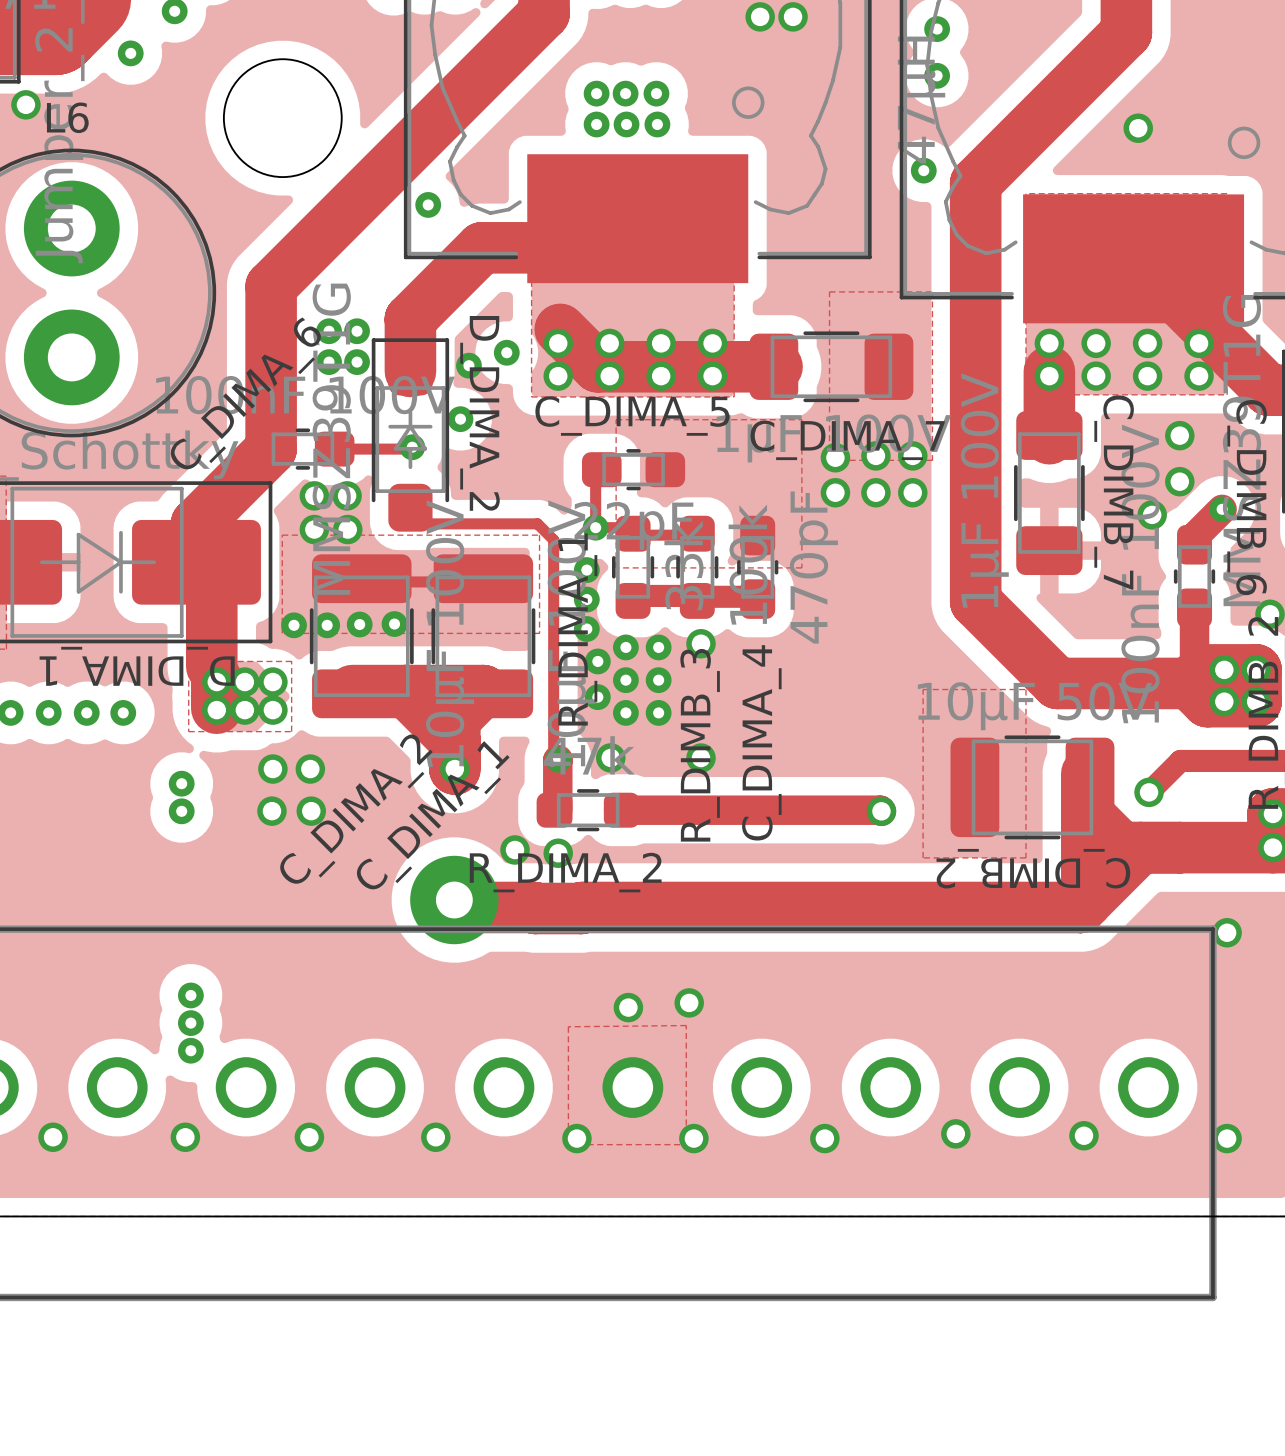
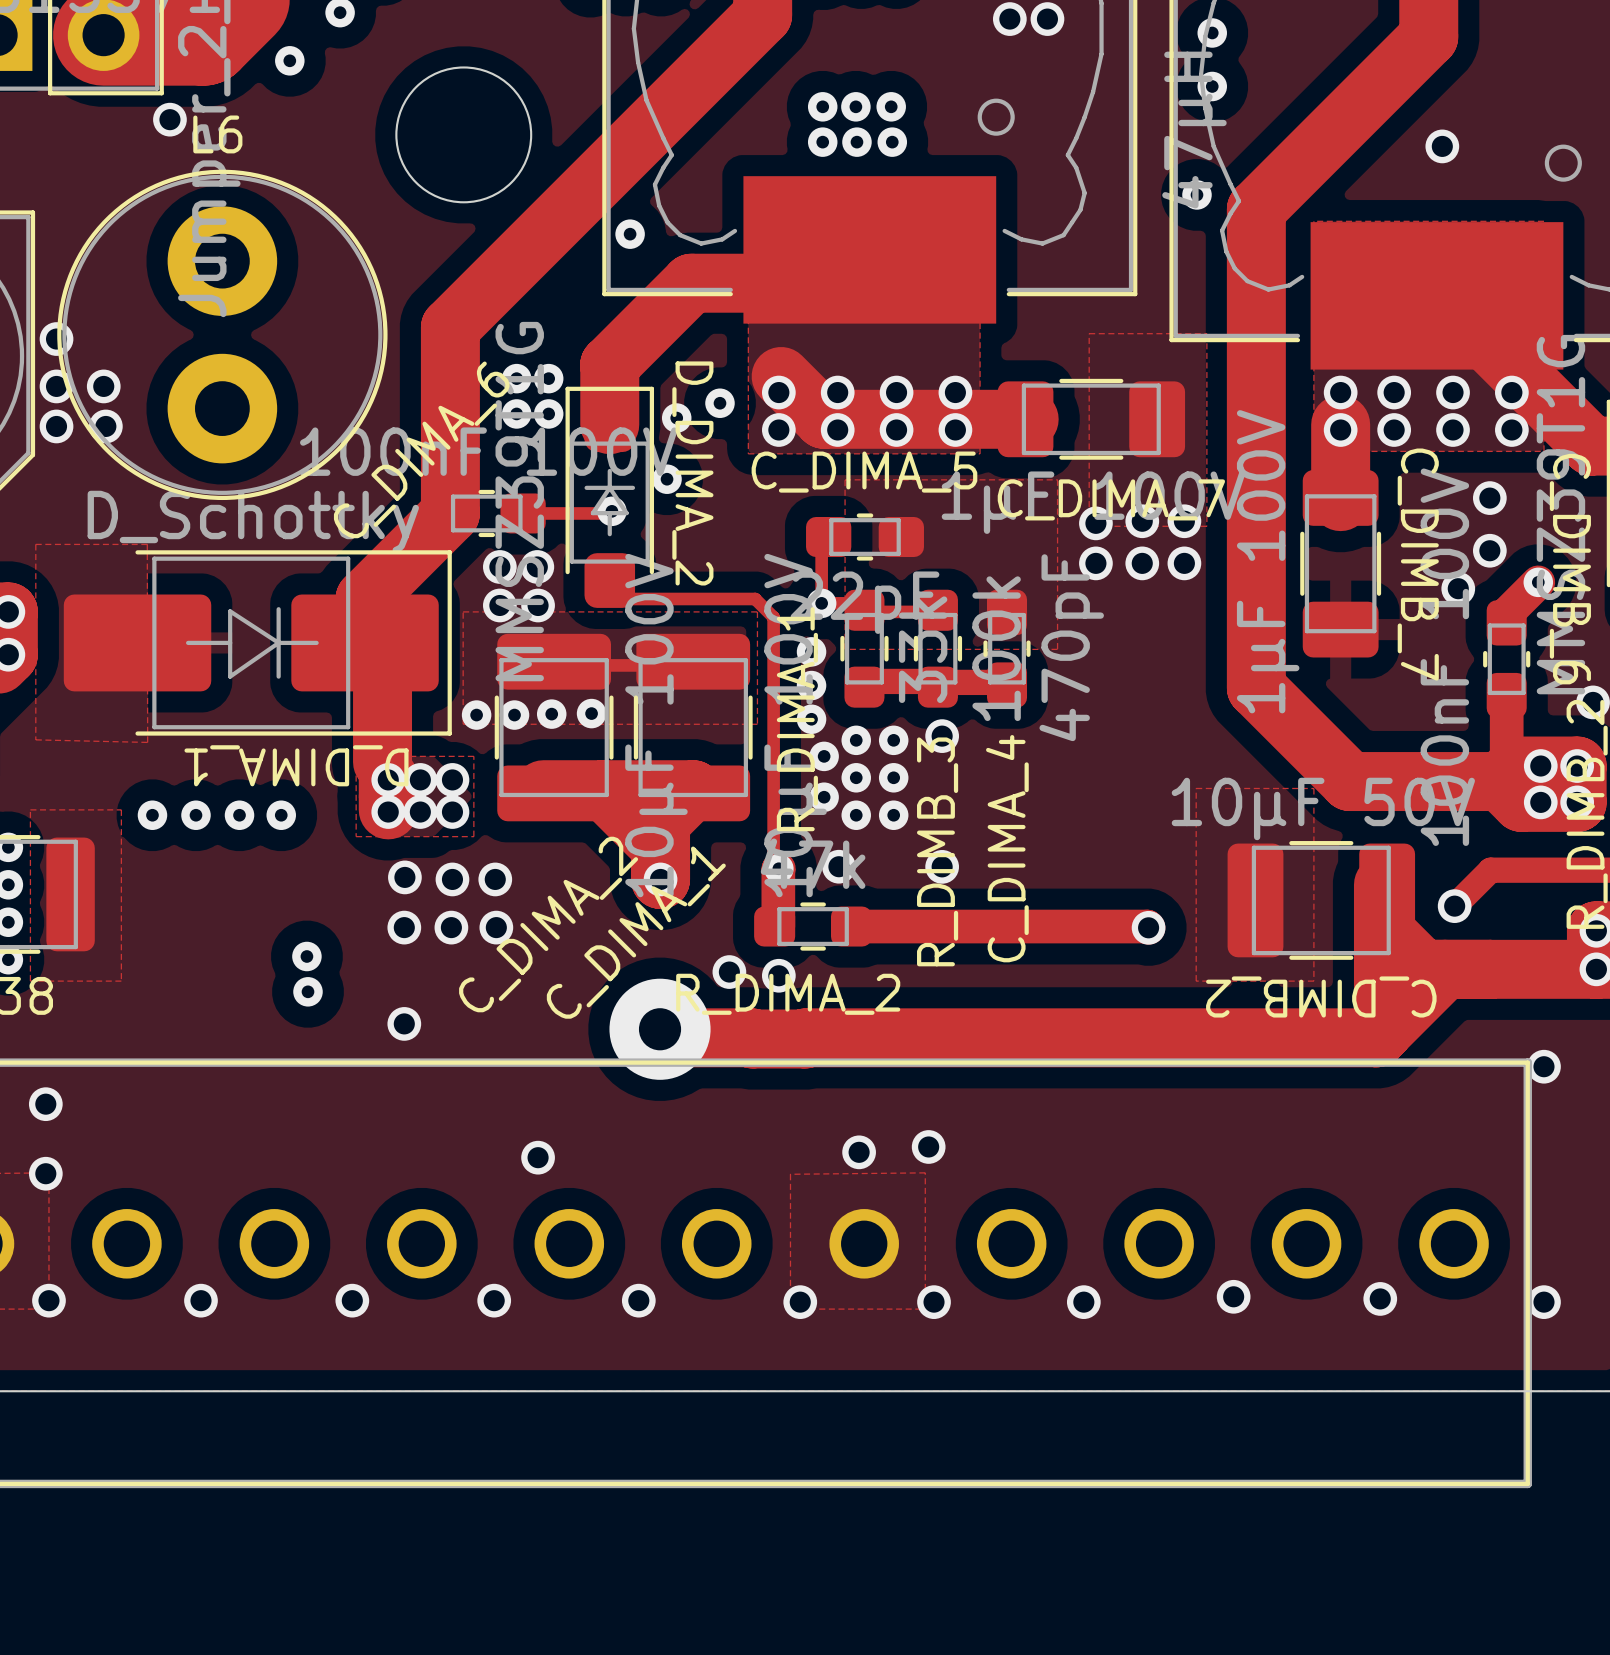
via: none -> (404, 877)
via: (181, 783) -> none
via: (181, 811) -> none
via: none -> (404, 927)
via: none -> (306, 956)
via: none -> (307, 991)
via: none -> (404, 1023)
via: (190, 995) -> none
via: none -> (538, 1157)
via: (190, 1023) -> none
via: (190, 1050) -> none

